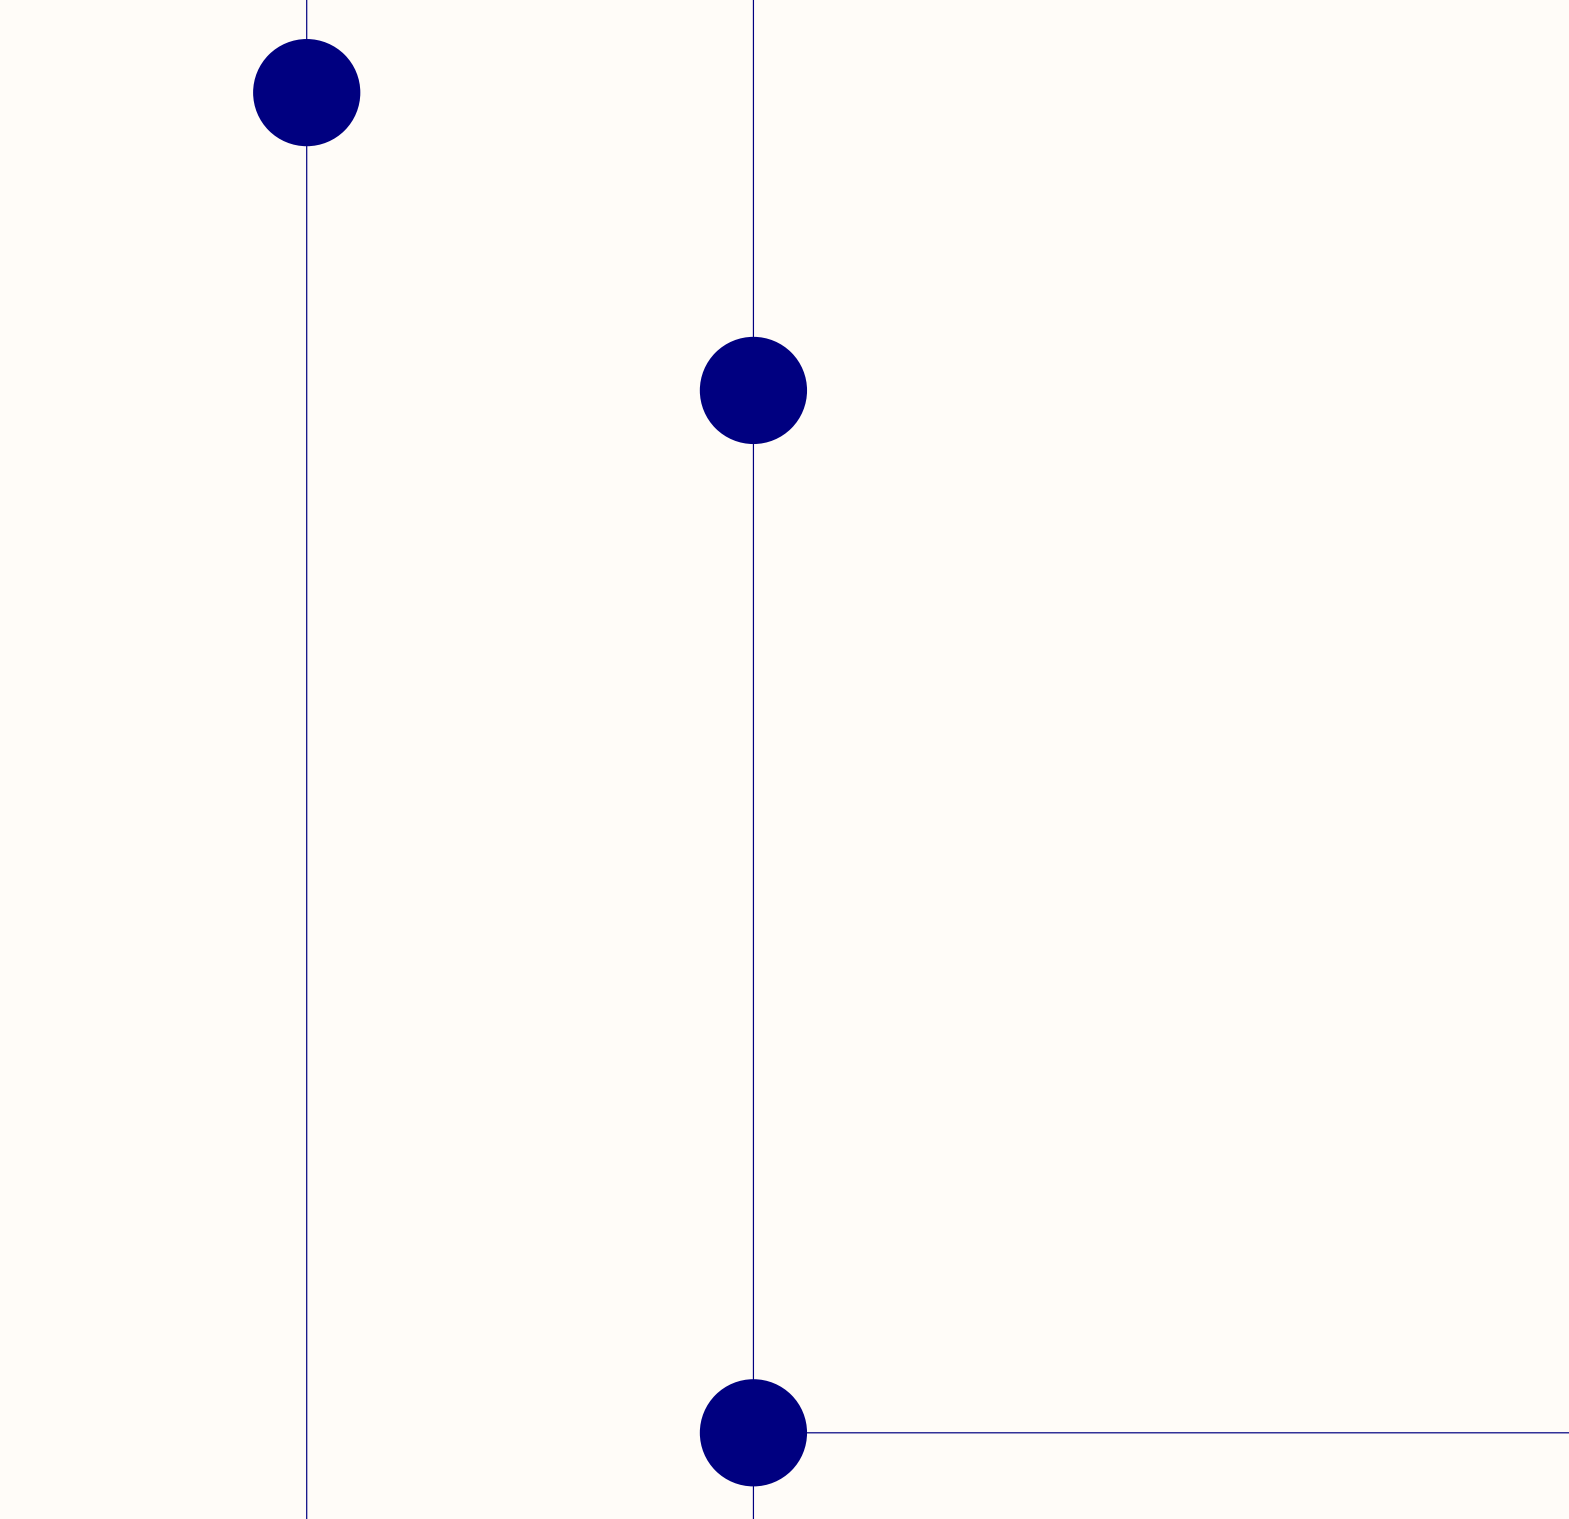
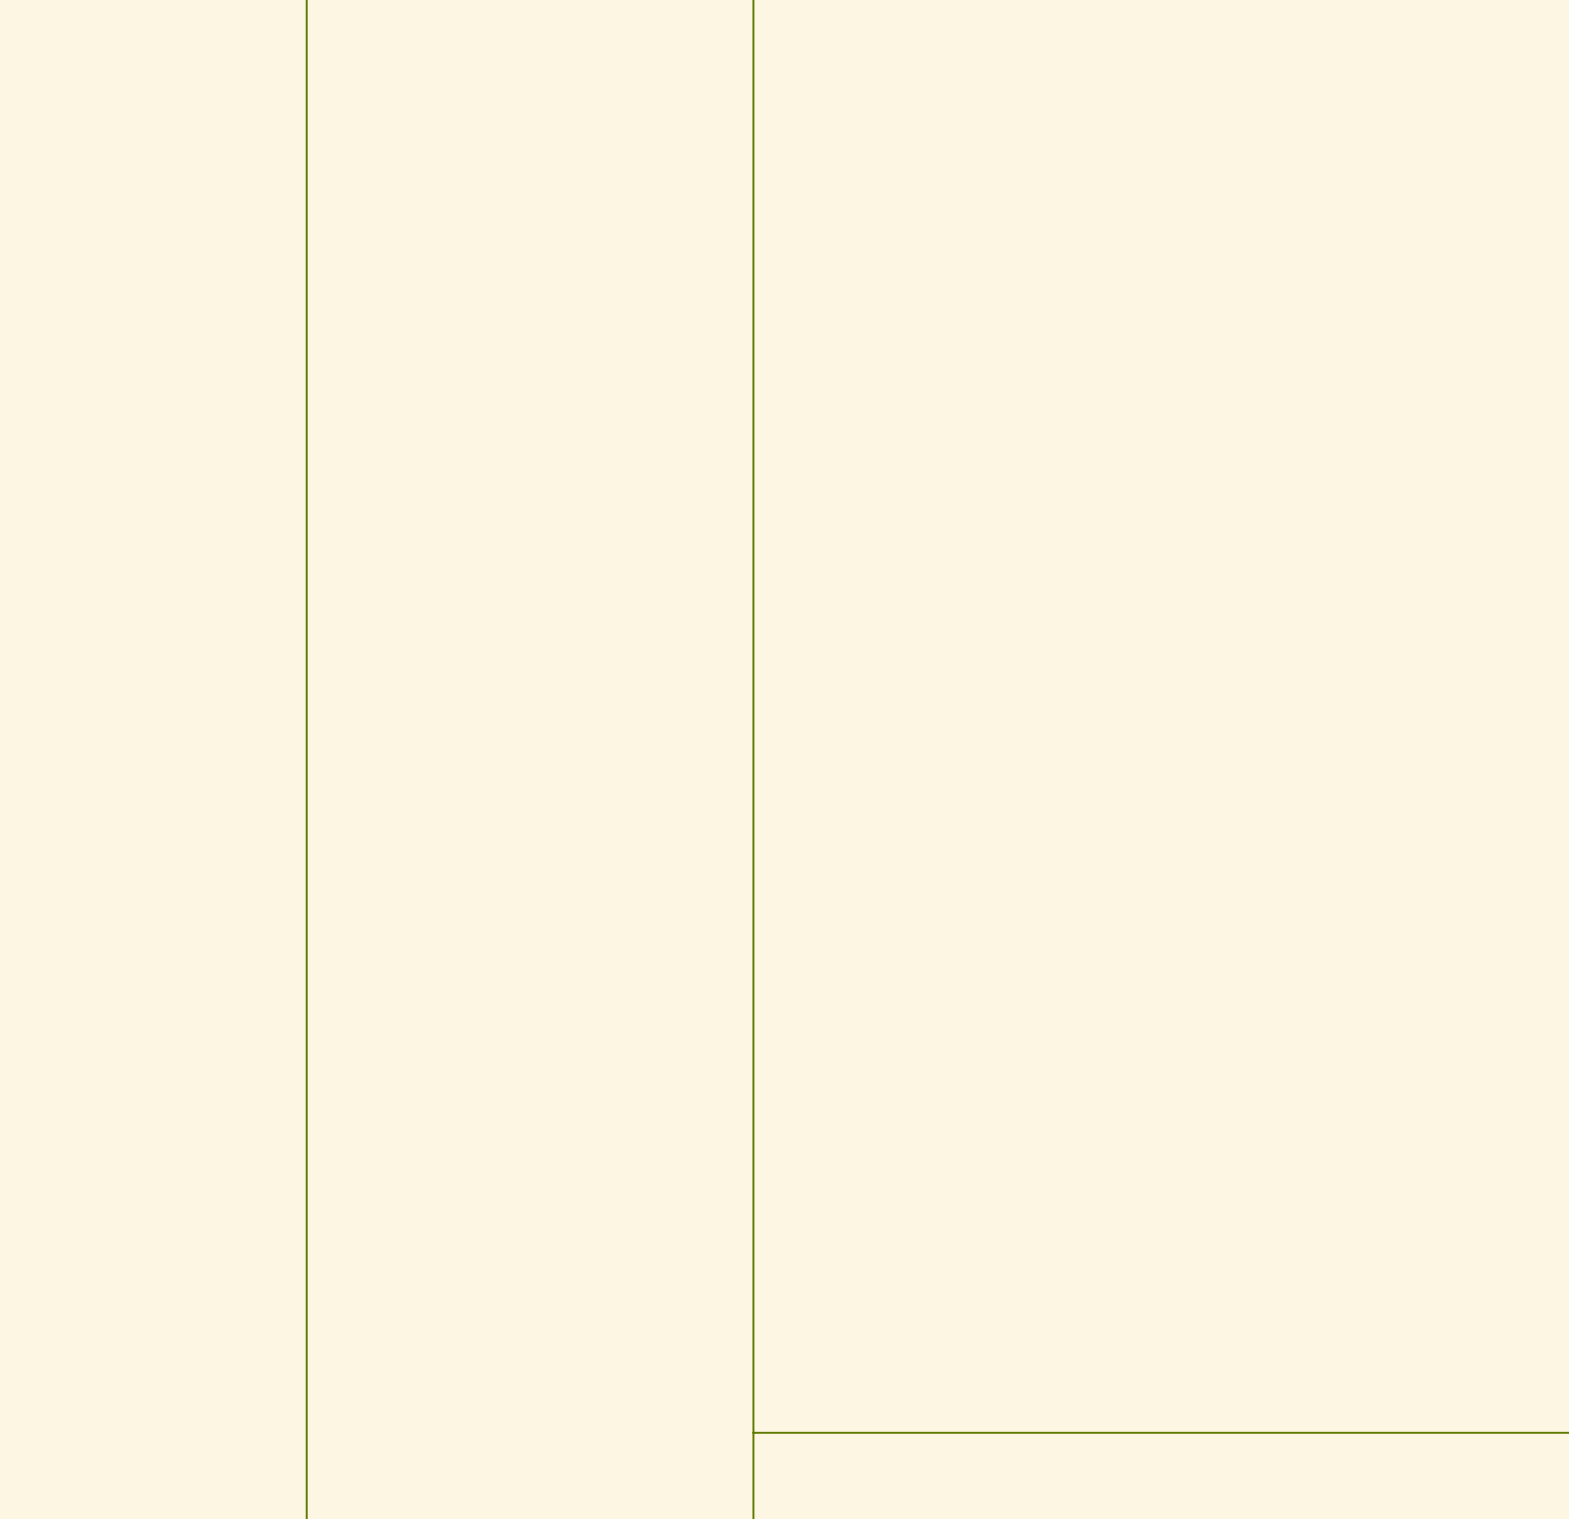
junction: (306, 92) -> none
junction: (753, 390) -> none
junction: (753, 1432) -> none

